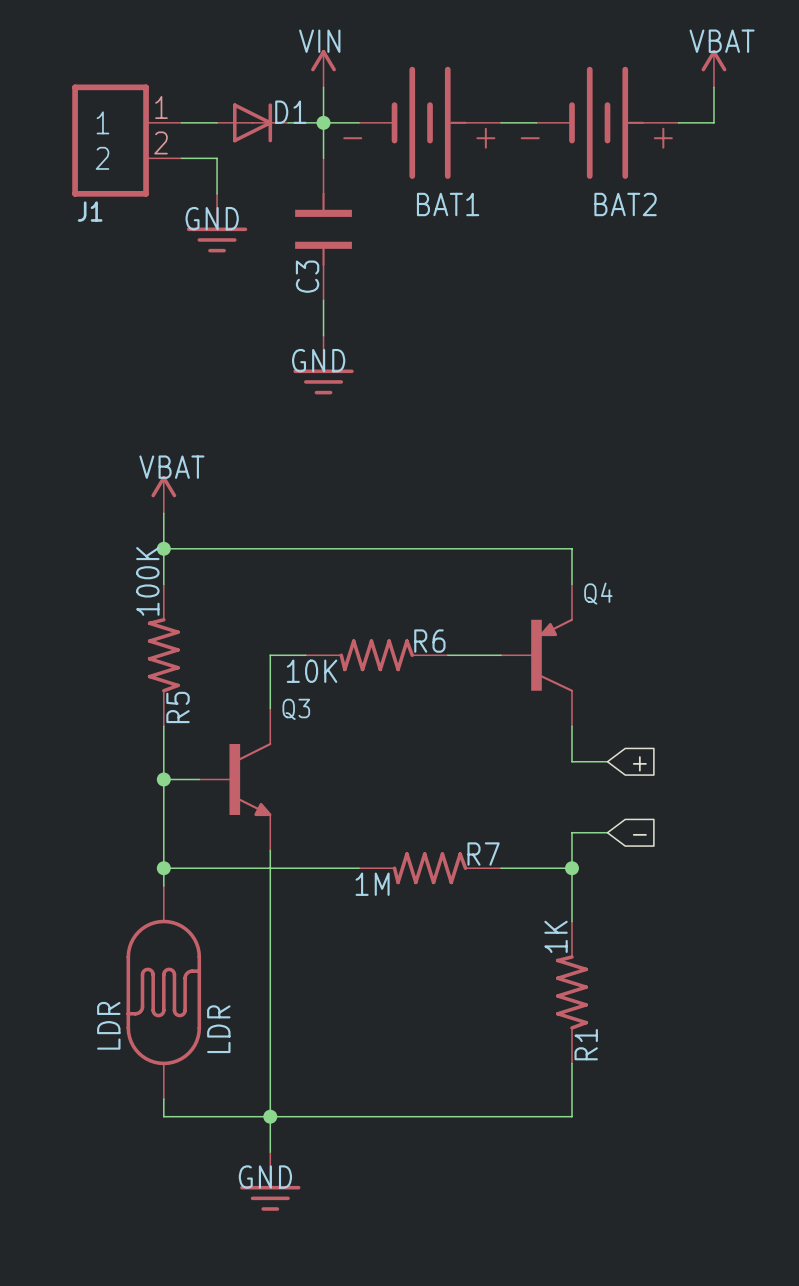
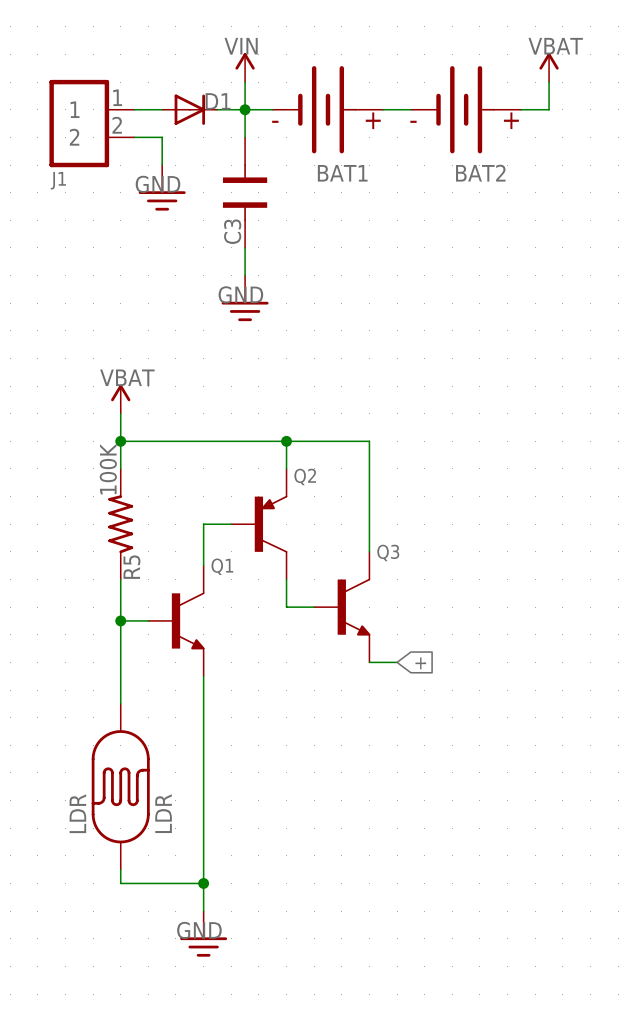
wire: none -> (286, 441) (286, 468)
junction: none -> (286, 441)
wire: (483, 548) (572, 548) (572, 584) -> (369, 441) (369, 551)
Q2: none -> (259, 524)
R6: 10K (376, 655) -> none
wire: (447, 655) (501, 655) -> none
Q4: (537, 655) -> none
Q3 name: Q3 (296, 709) -> Q1 (222, 566)
wire: (572, 726) (572, 761) (607, 761) -> (286, 579) (286, 607) (314, 607)
Q3: none -> (342, 607)
global label position: + (639, 763) -> + (420, 663)
wire: none -> (369, 662) (397, 662)
wire: (607, 832) (572, 832) (572, 921) -> none
global label: - (639, 834) -> none
wire: (163, 868) (359, 868) -> none
junction: (163, 868) -> none
R7: 1M (430, 868) -> none
wire: (501, 868) (572, 868) -> none
junction: (572, 868) -> none
R1: 1K (572, 992) -> none
wire: (572, 1063) (572, 1116) (270, 1116) -> none

